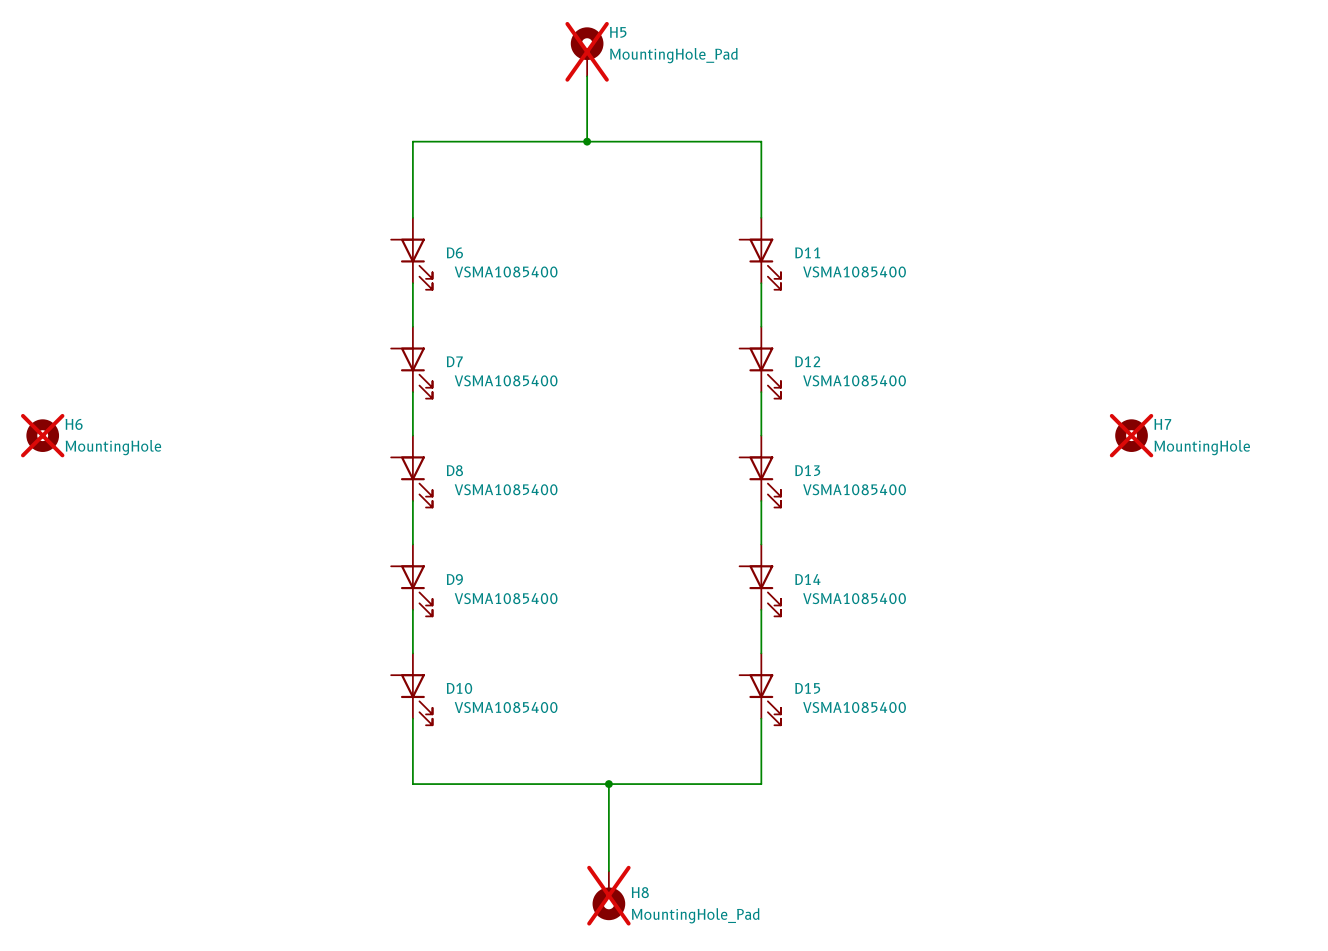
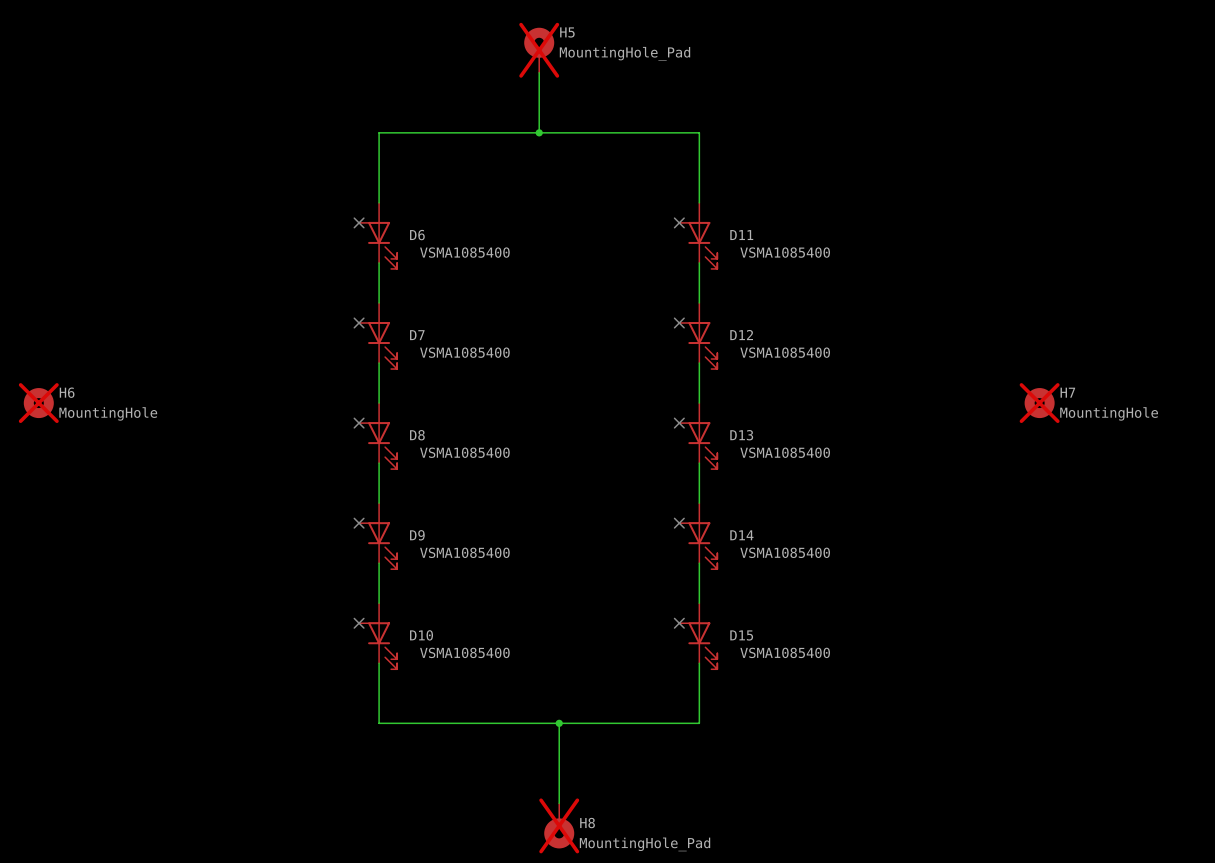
no-connect mark: none -> (359, 222)
no-connect mark: none -> (679, 222)
no-connect mark: none -> (359, 323)
no-connect mark: none -> (679, 323)
no-connect mark: none -> (359, 423)
no-connect mark: none -> (679, 423)
no-connect mark: none -> (359, 523)
no-connect mark: none -> (679, 523)
no-connect mark: none -> (359, 623)
no-connect mark: none -> (679, 623)

